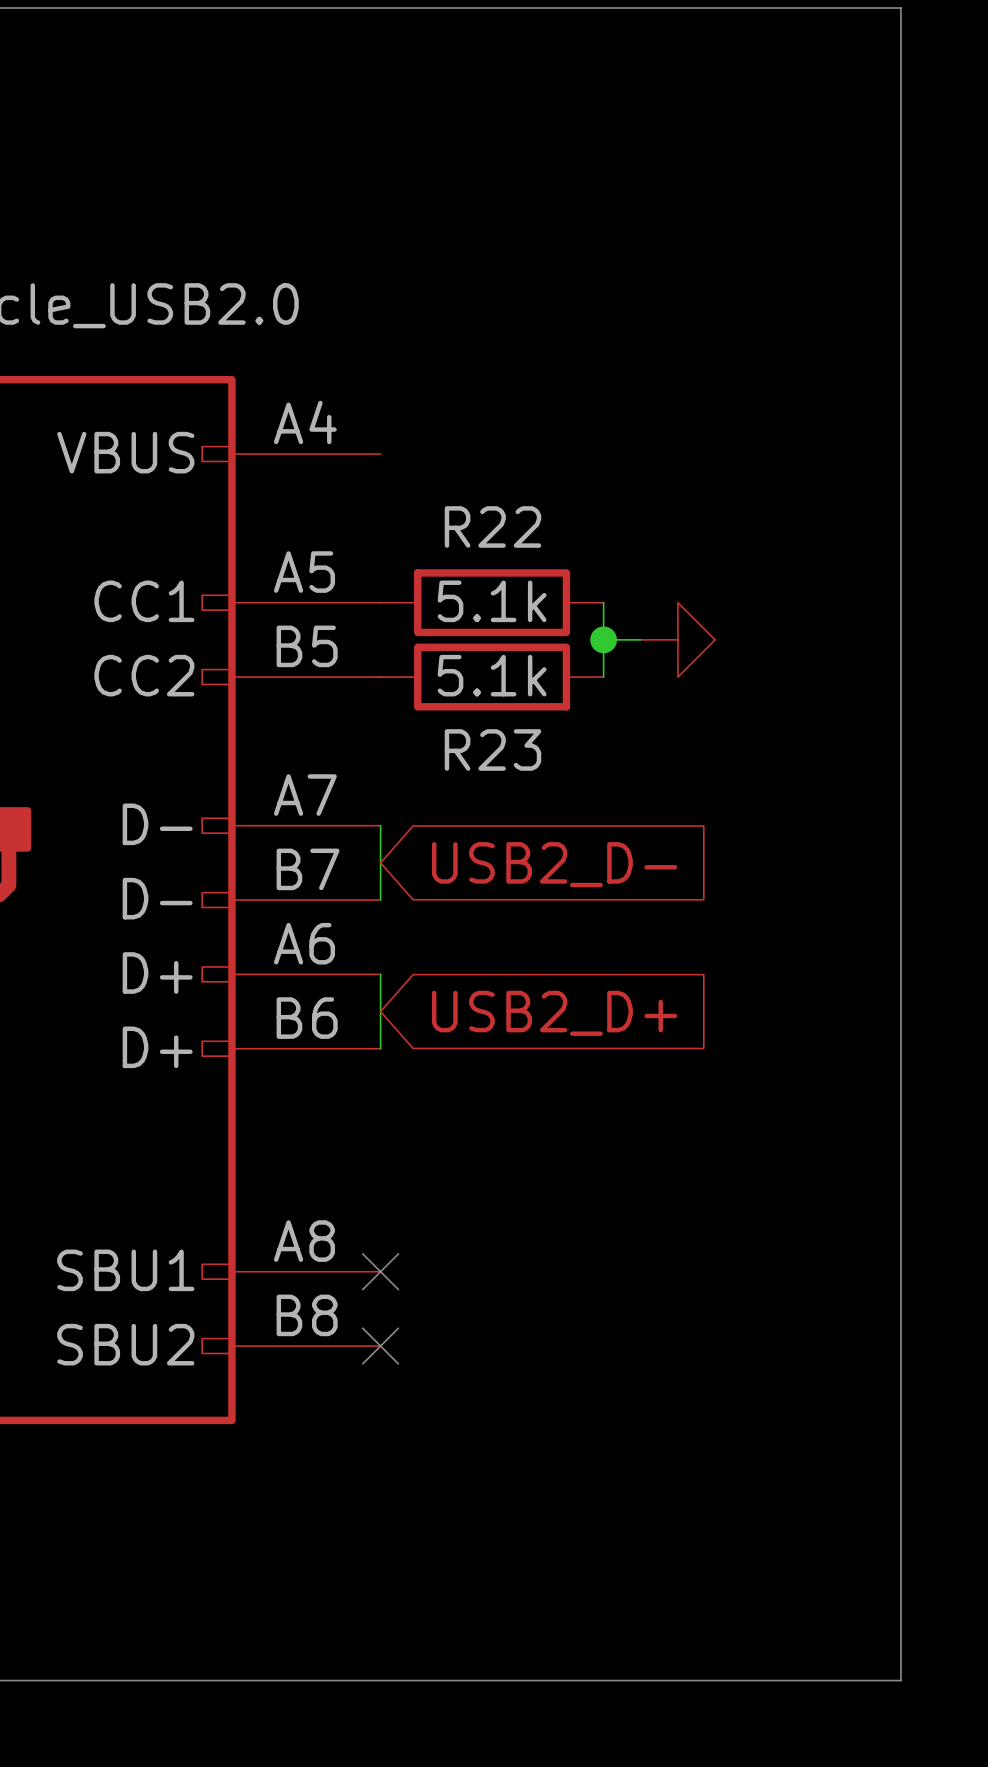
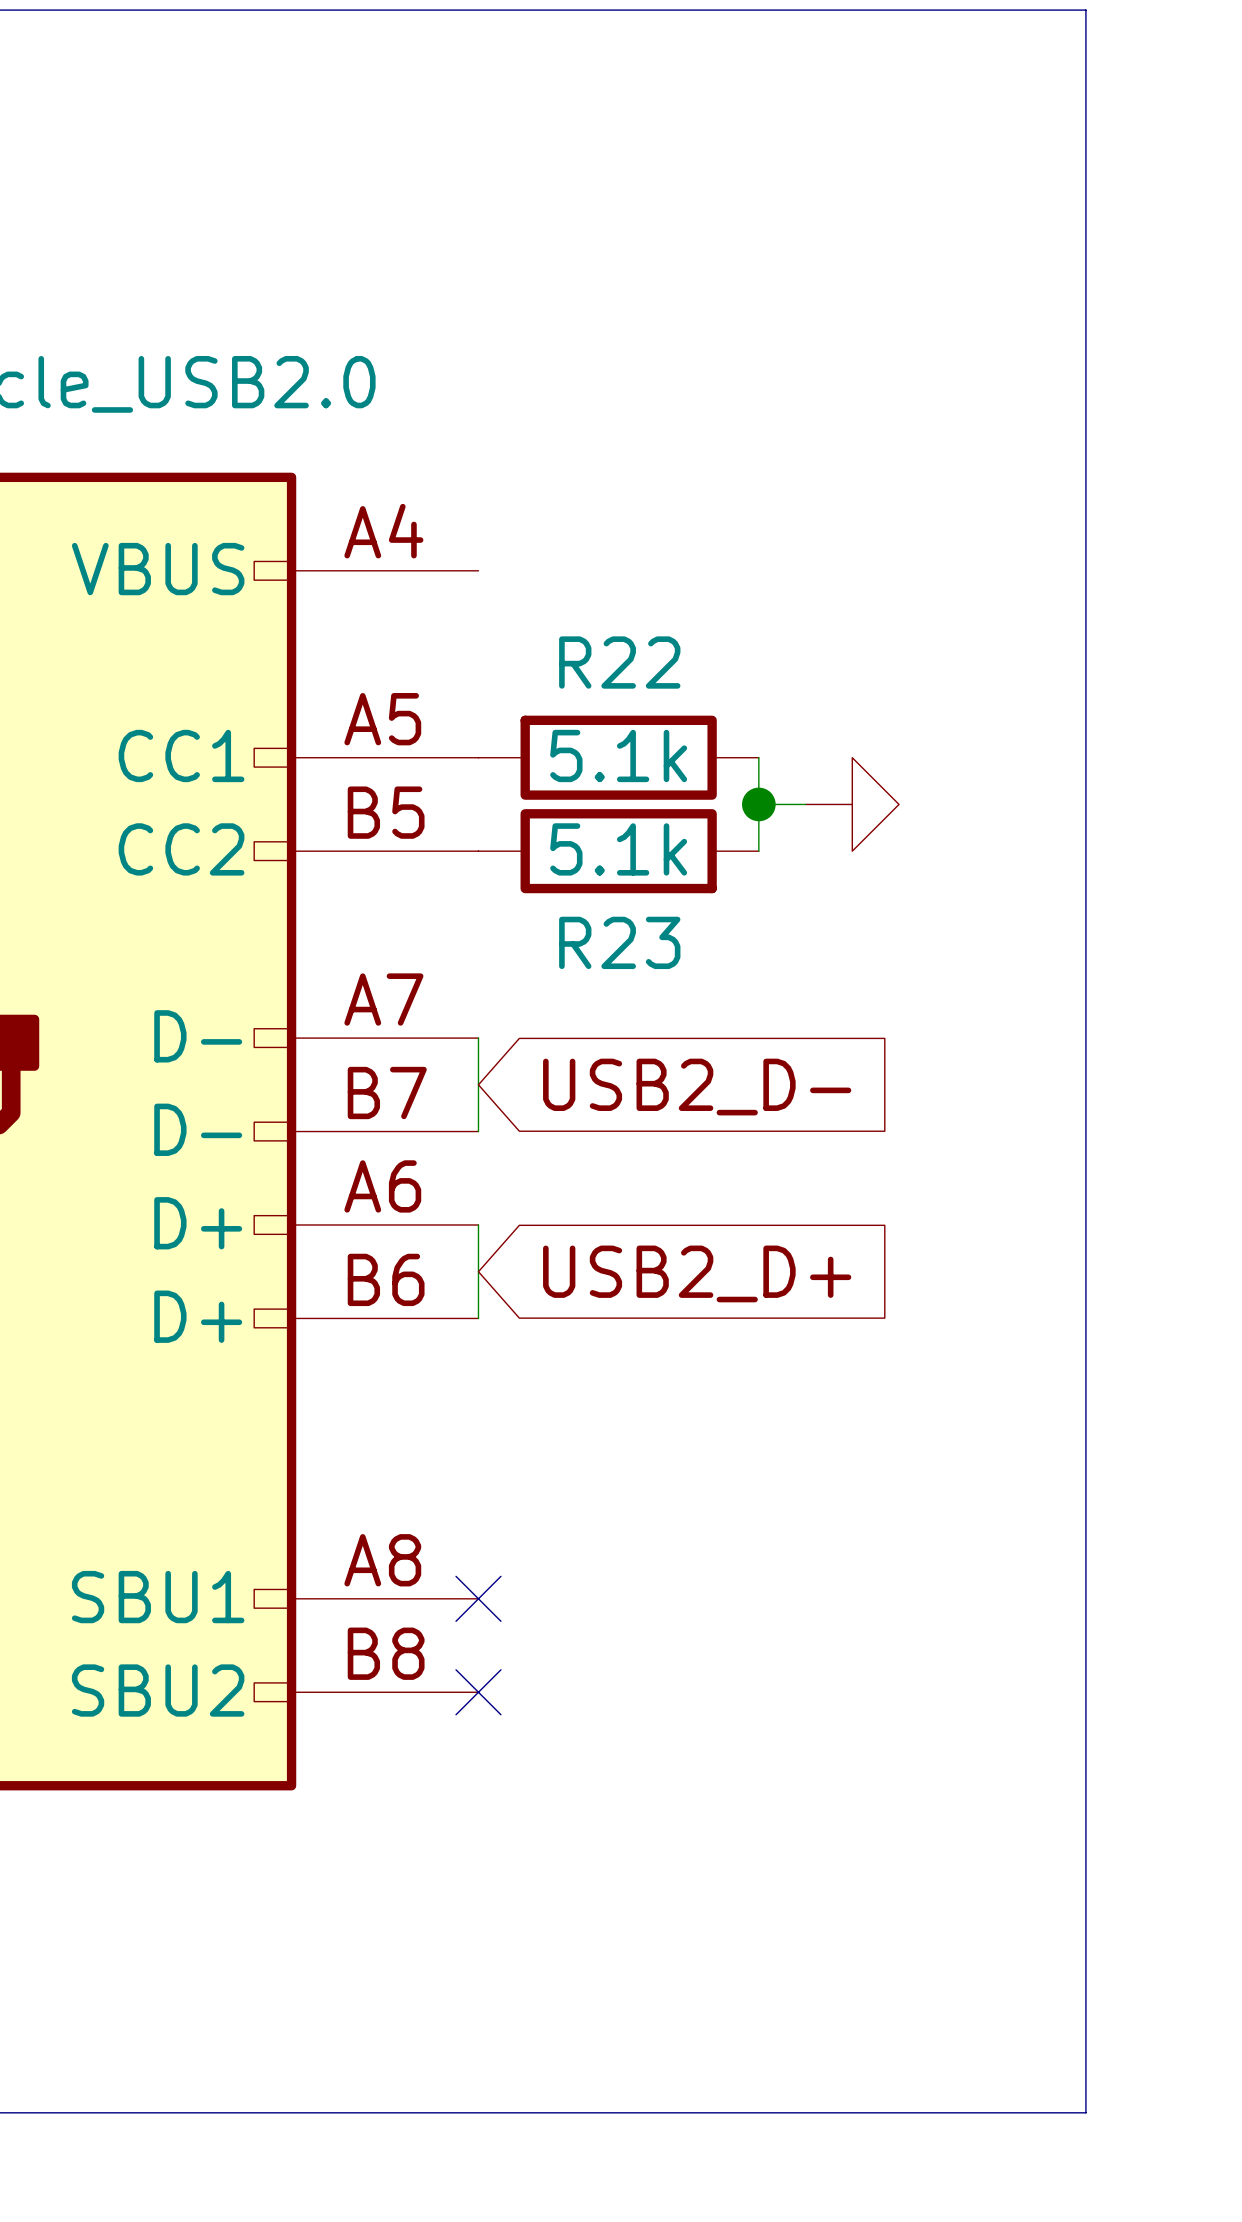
line: (863, 8) (900, 8) (900, 1680) (863, 1680) -> (1085, 10) (1085, 2112)

